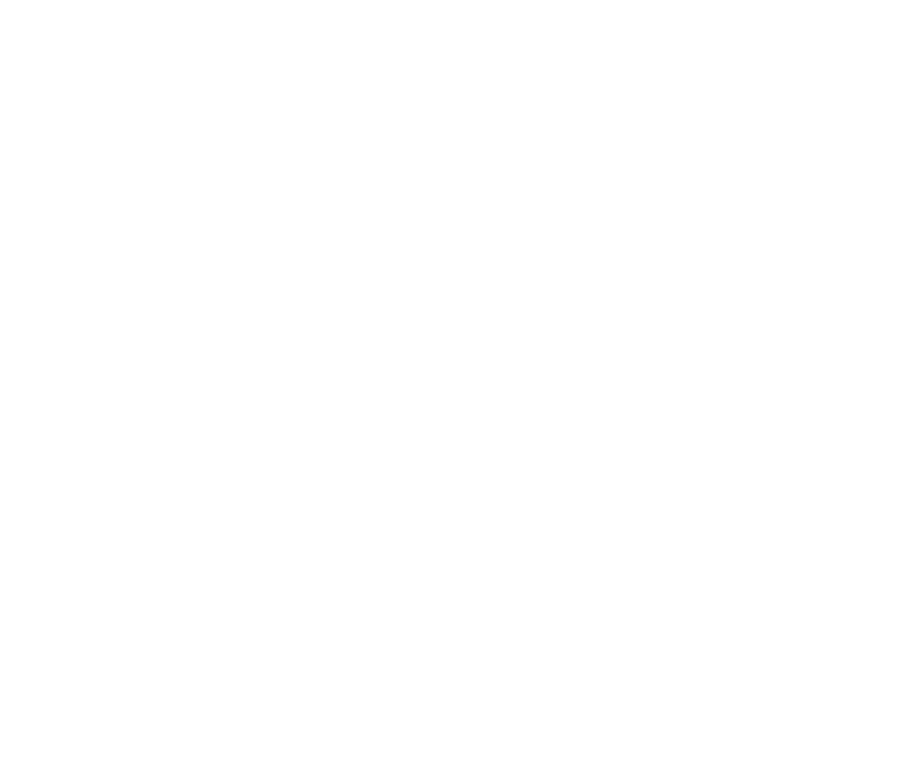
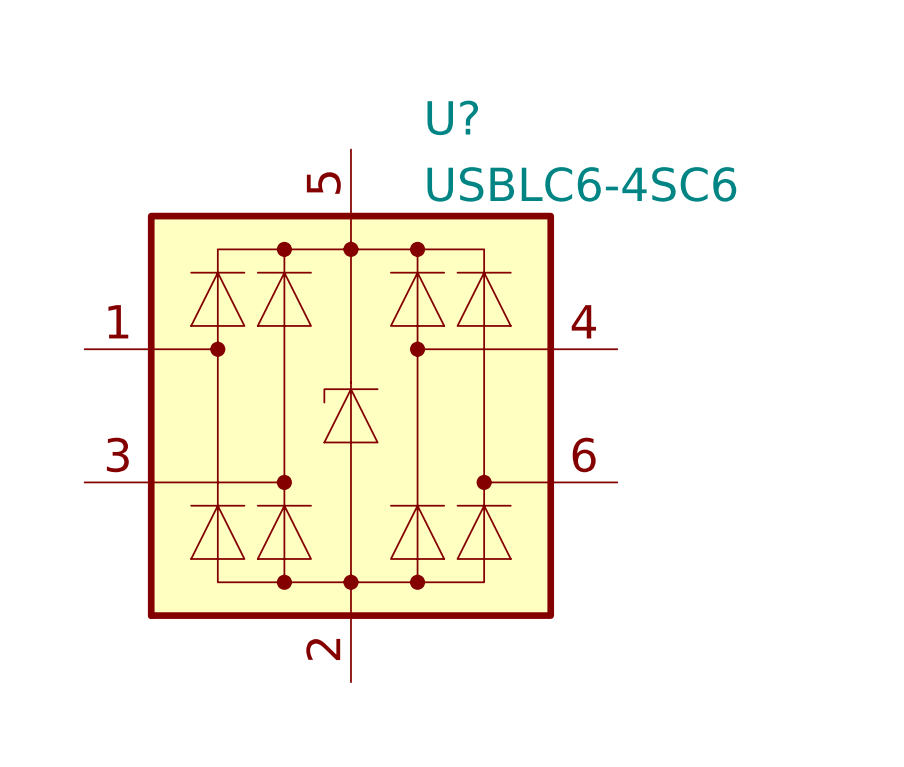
U?: none -> USBLC6-4SC6 (350, 415)

